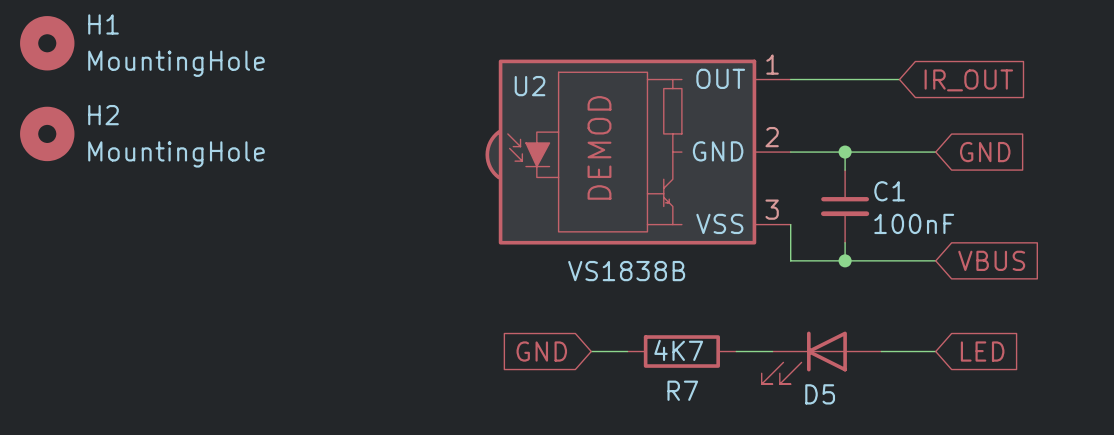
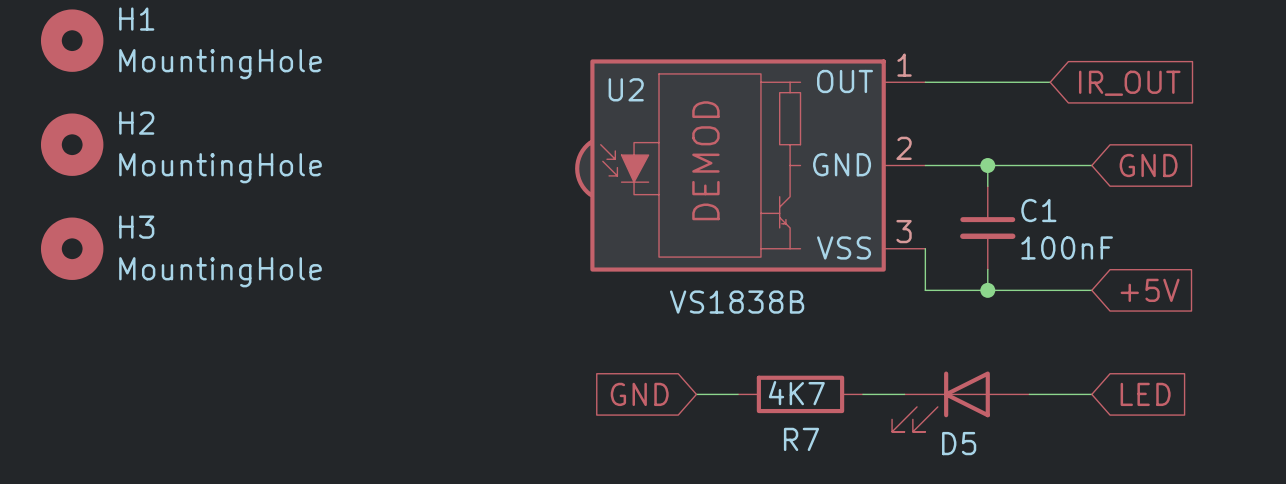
H3: none -> MountingHole (72, 248)
global label: VBUS (991, 260) -> +5V (1150, 290)

